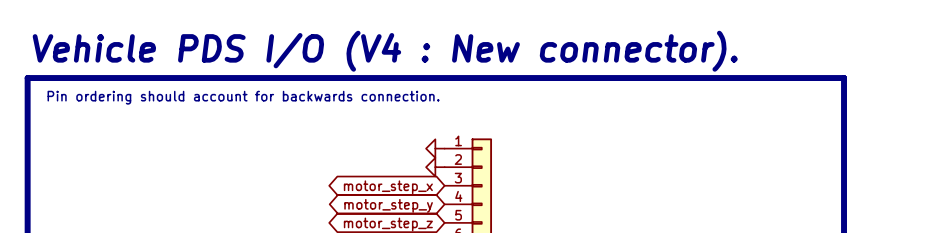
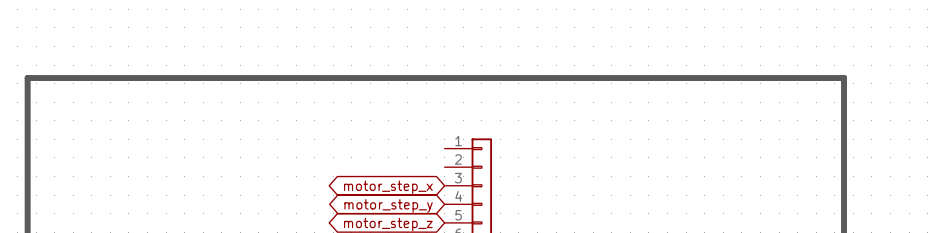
text: Vehicle PDS I/O (V4 : New connector). (385, 51) -> none
text: Pin ordering should account for backwards connection. (243, 97) -> none
power symbol: (435, 148) -> none
power symbol: (435, 167) -> none

